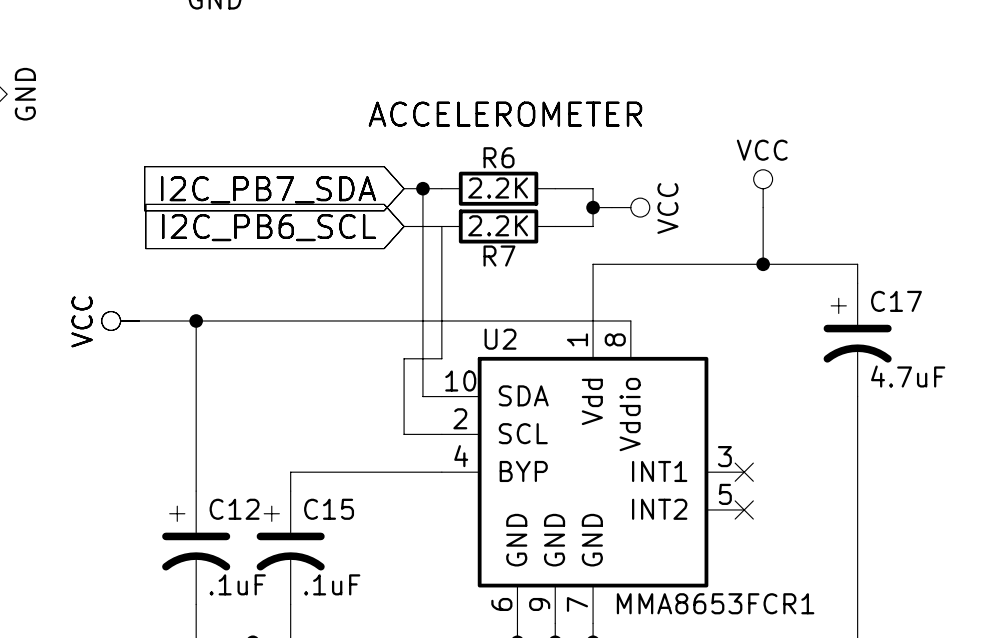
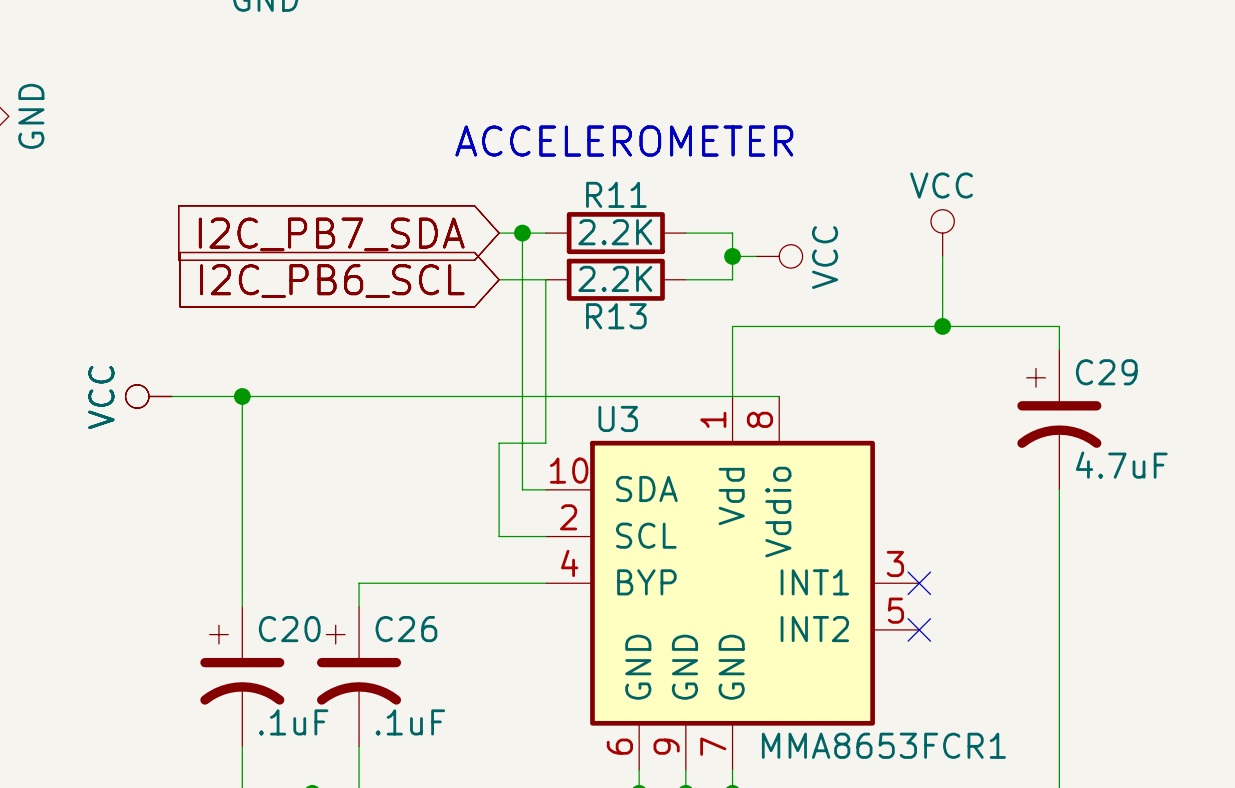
R6 name: R6 (499, 157) -> R11 (616, 194)
R7 name: R7 (499, 256) -> R13 (616, 316)
C17 name: C17 (896, 301) -> C29 (1106, 372)
U2 name: U2 (500, 339) -> U3 (618, 418)
C12 name: C12 (234, 509) -> C20 (289, 629)
C15 name: C15 (329, 509) -> C26 (406, 629)

